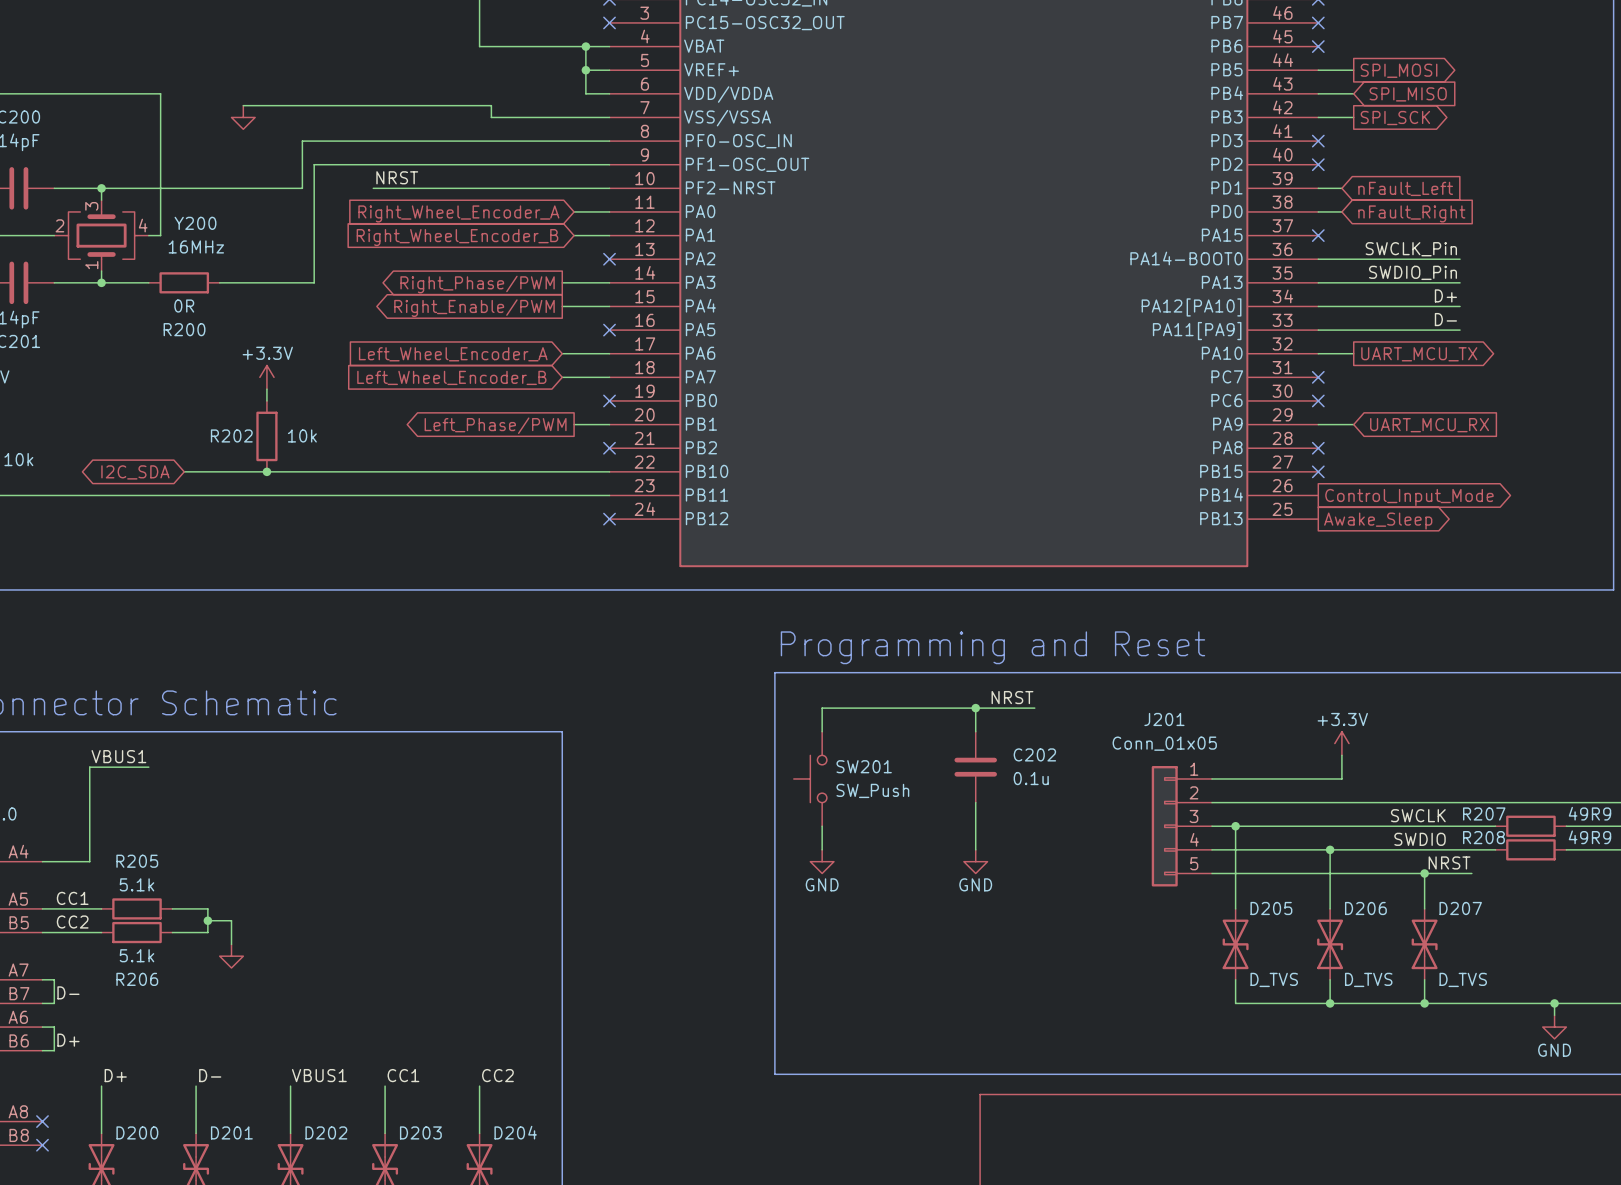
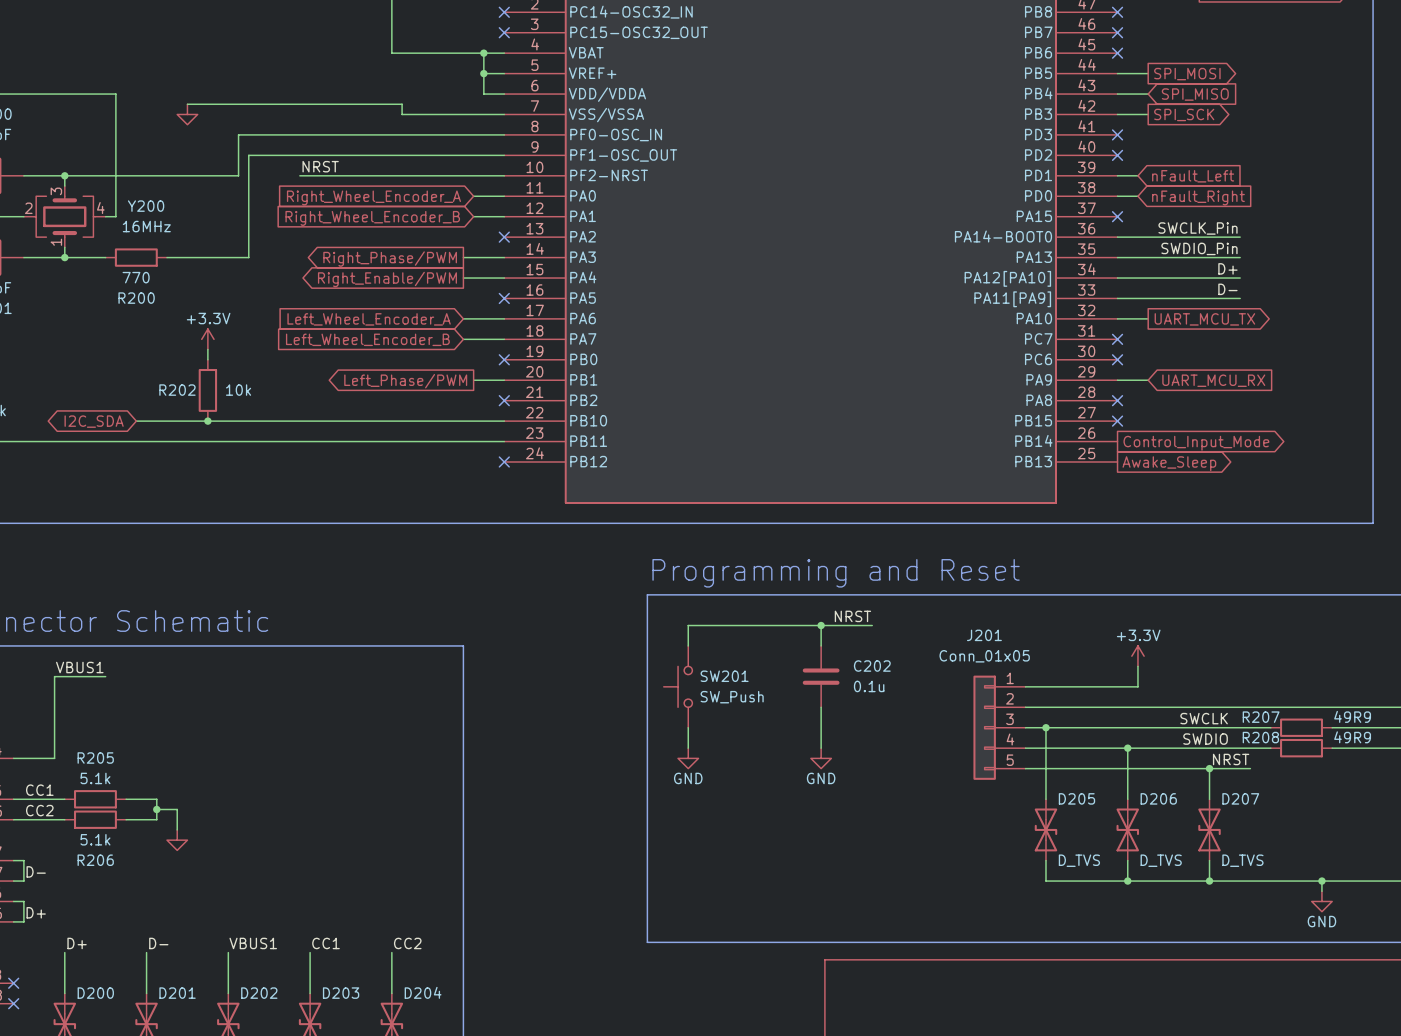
R200 value: 0R (184, 306) -> 770 (136, 277)

